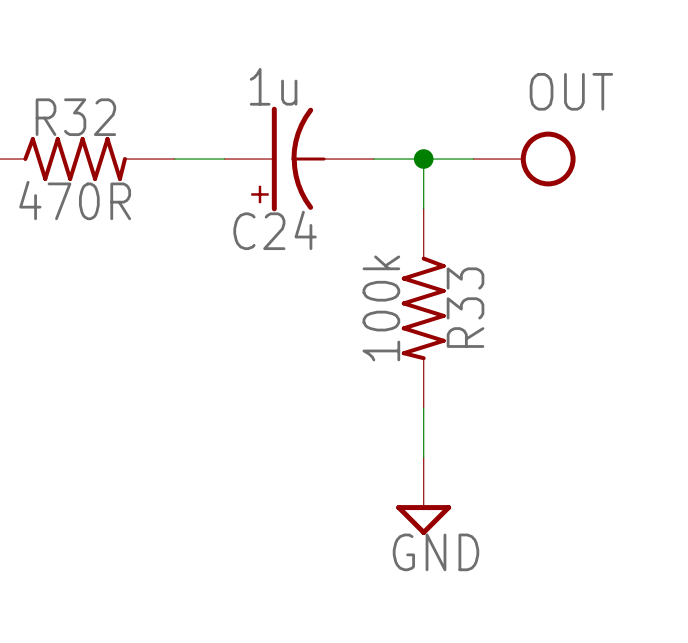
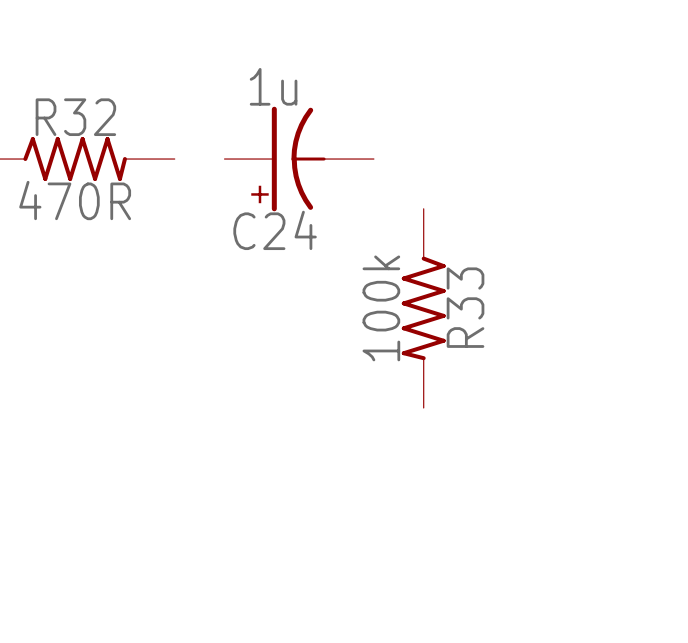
wire: (174, 159) (224, 159) -> none
wire: (373, 159) (473, 159) -> none
wire: (423, 159) (423, 208) -> none
junction: (423, 159) -> none
OUT: (524, 159) -> none
wire: (423, 407) (423, 457) -> none
power symbol: GND (423, 496) -> none

